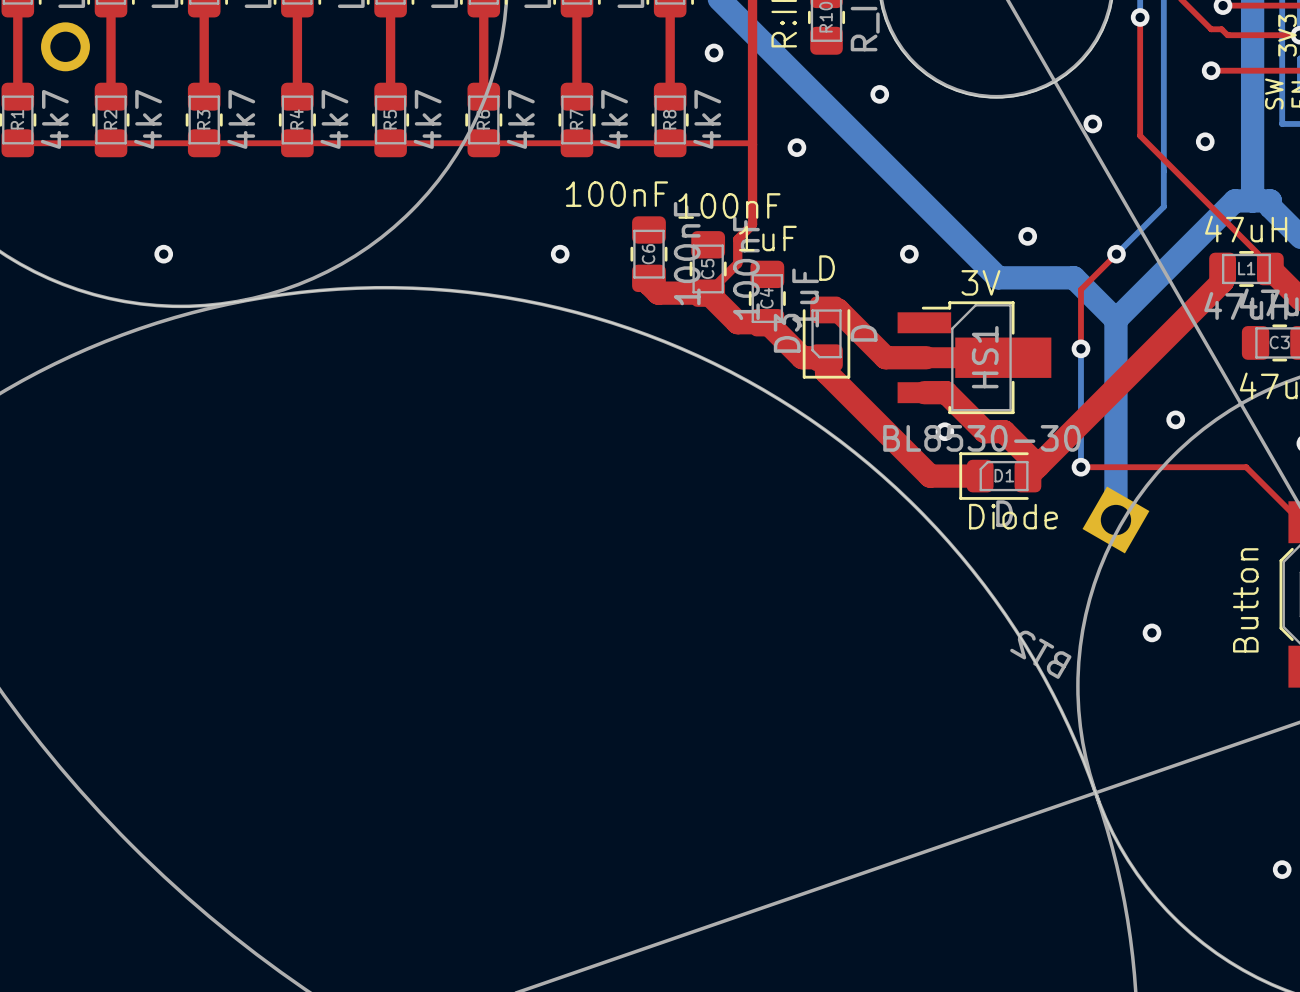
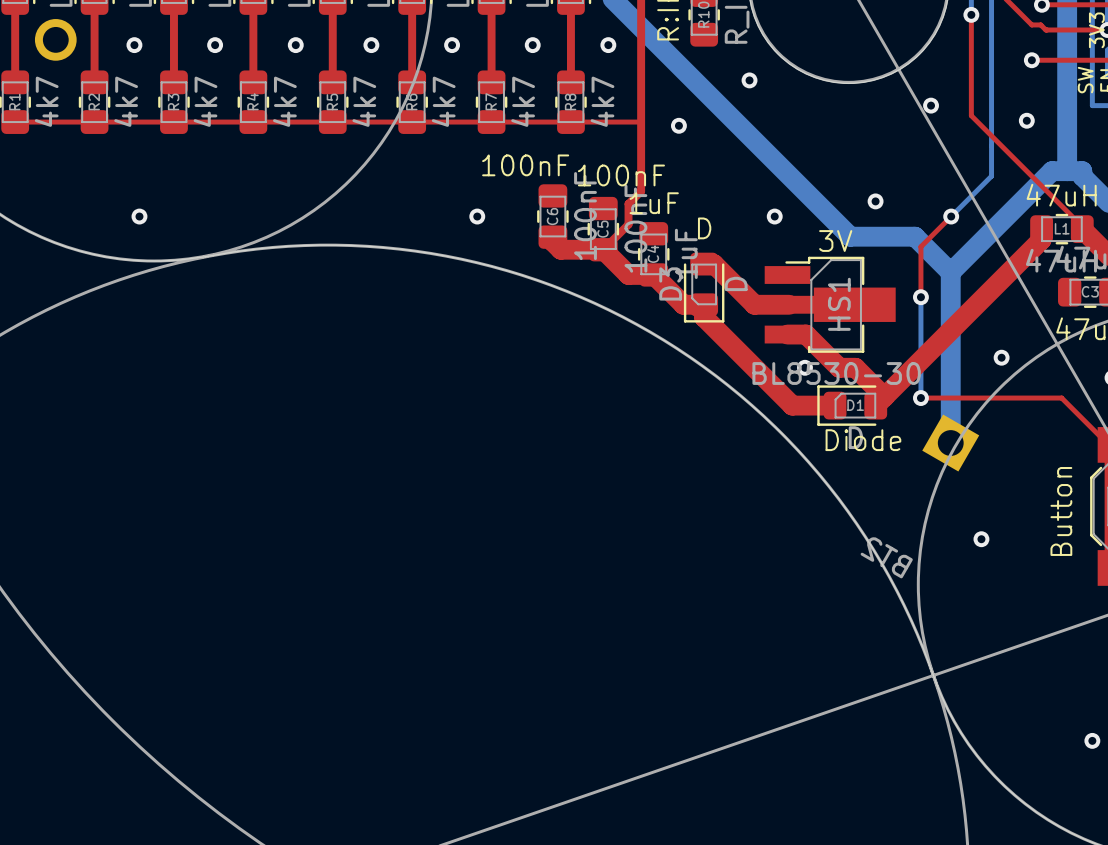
via: none -> (134, 45)
via: none -> (215, 45)
via: none -> (295, 45)
via: none -> (371, 45)
via: none -> (452, 45)
via: none -> (532, 45)

